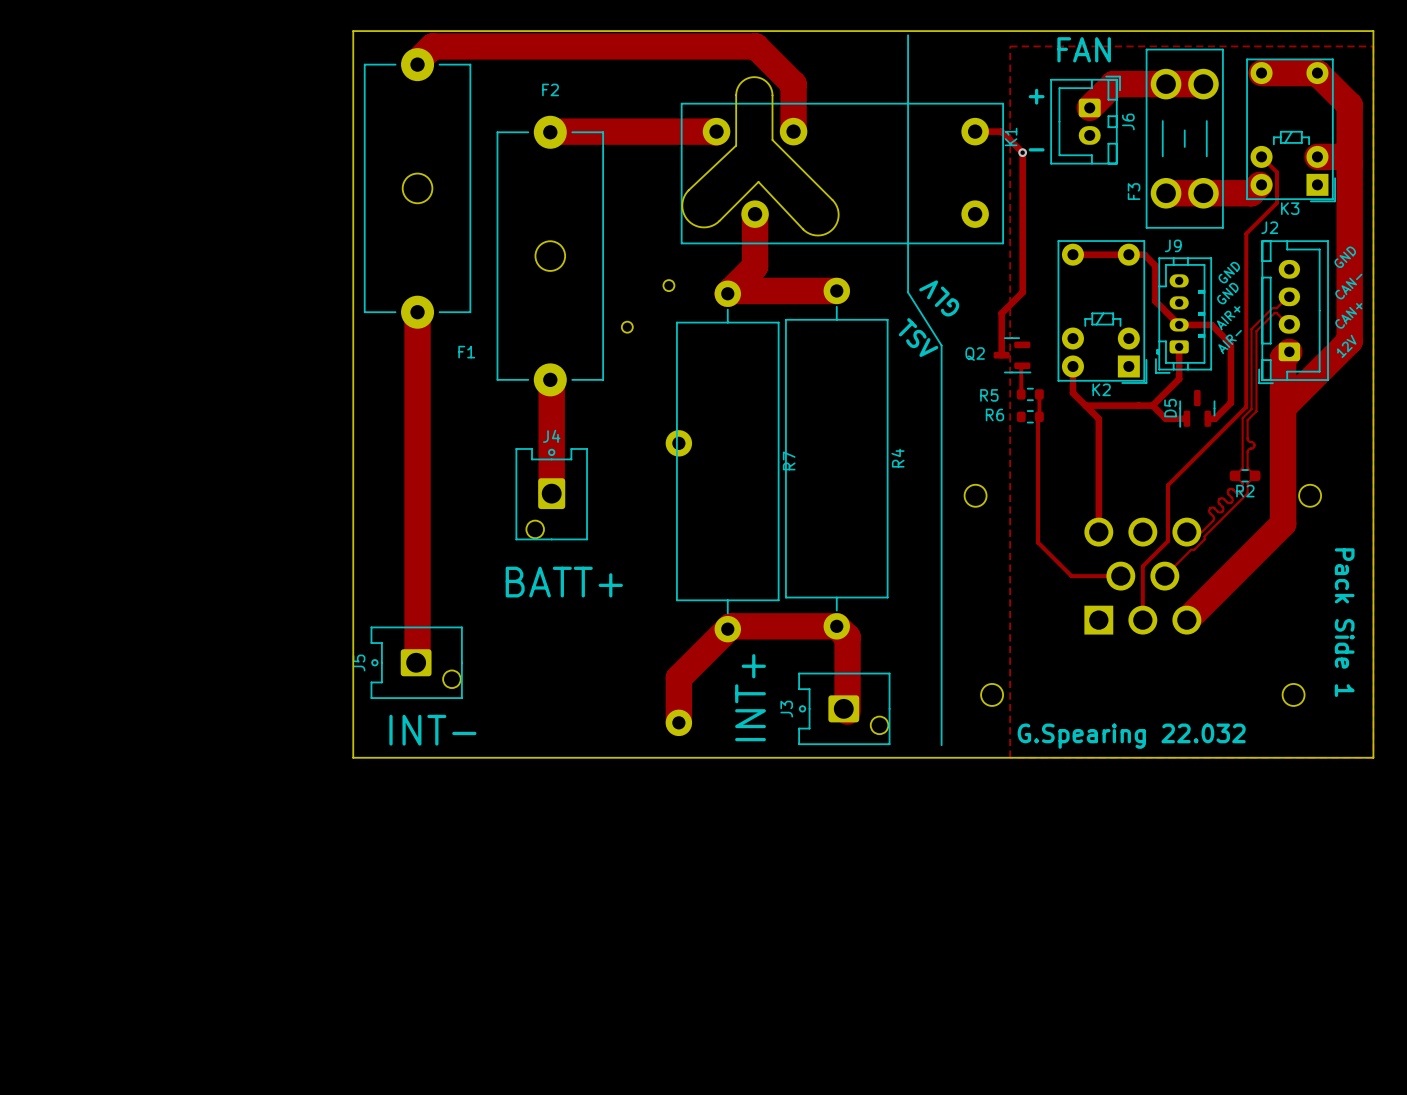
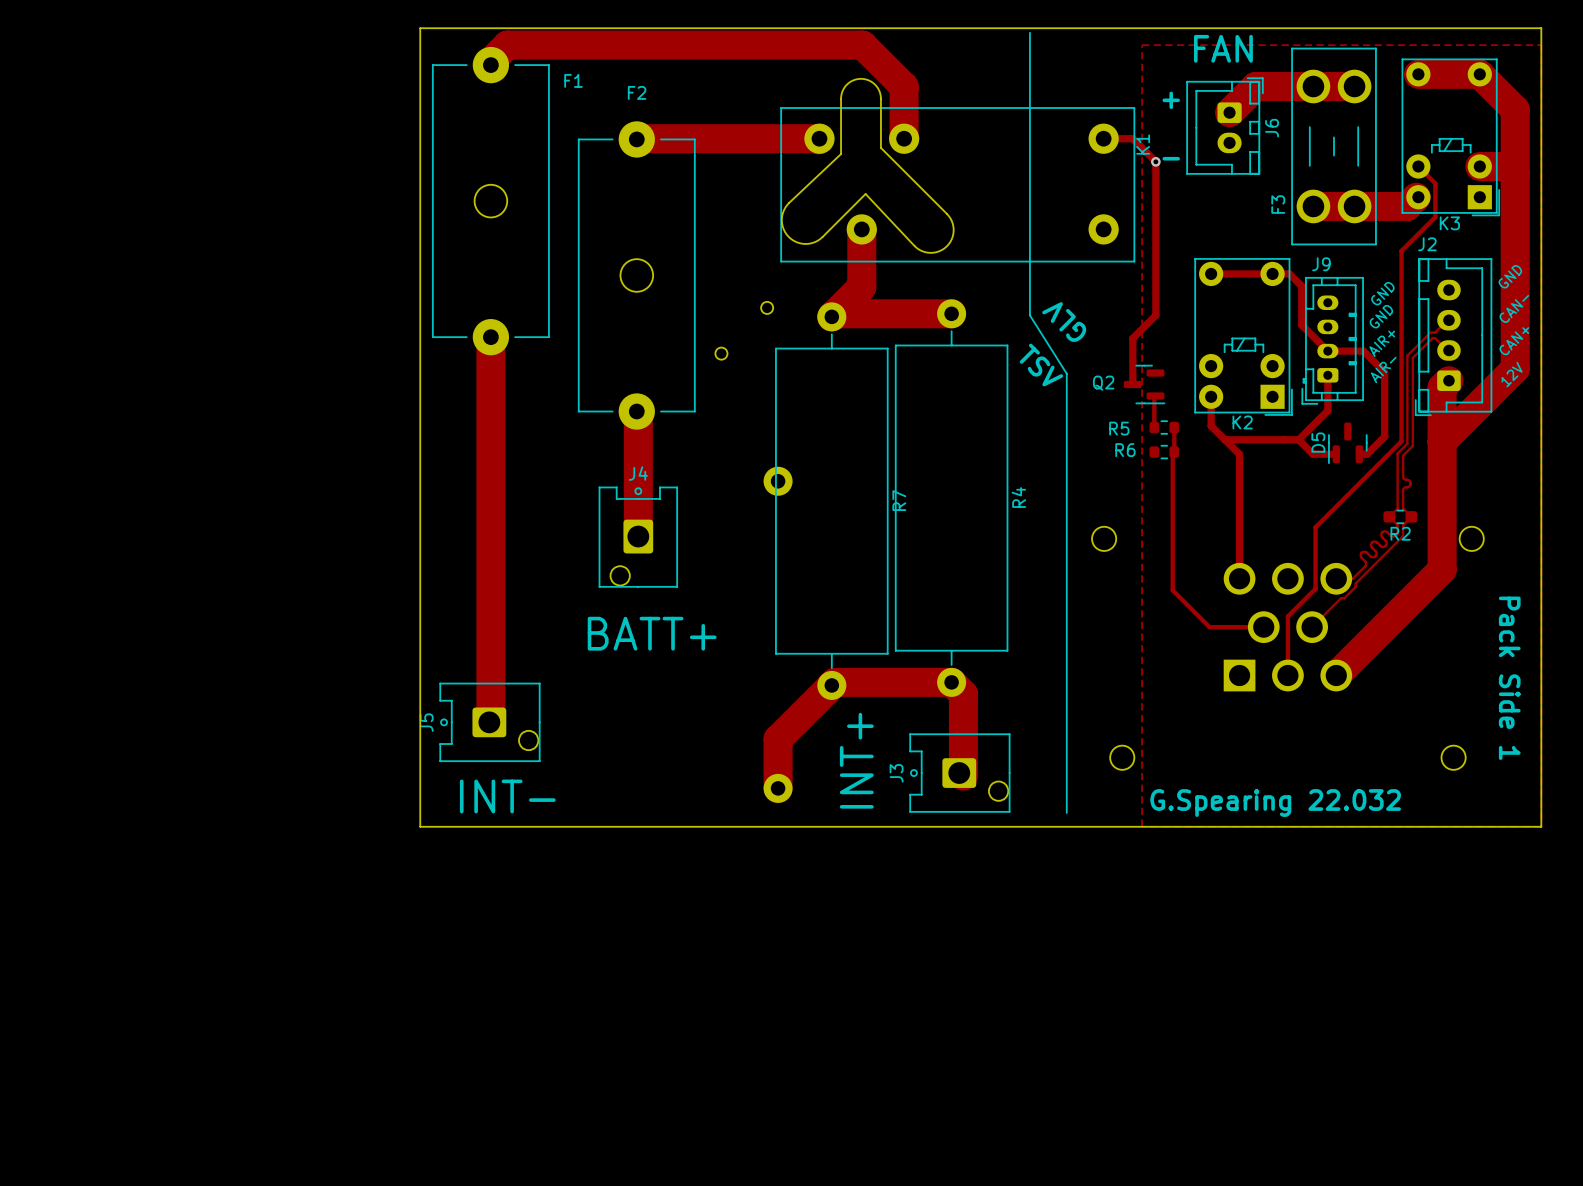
F1 name position: F1 (466, 352) -> F1 (573, 80)

